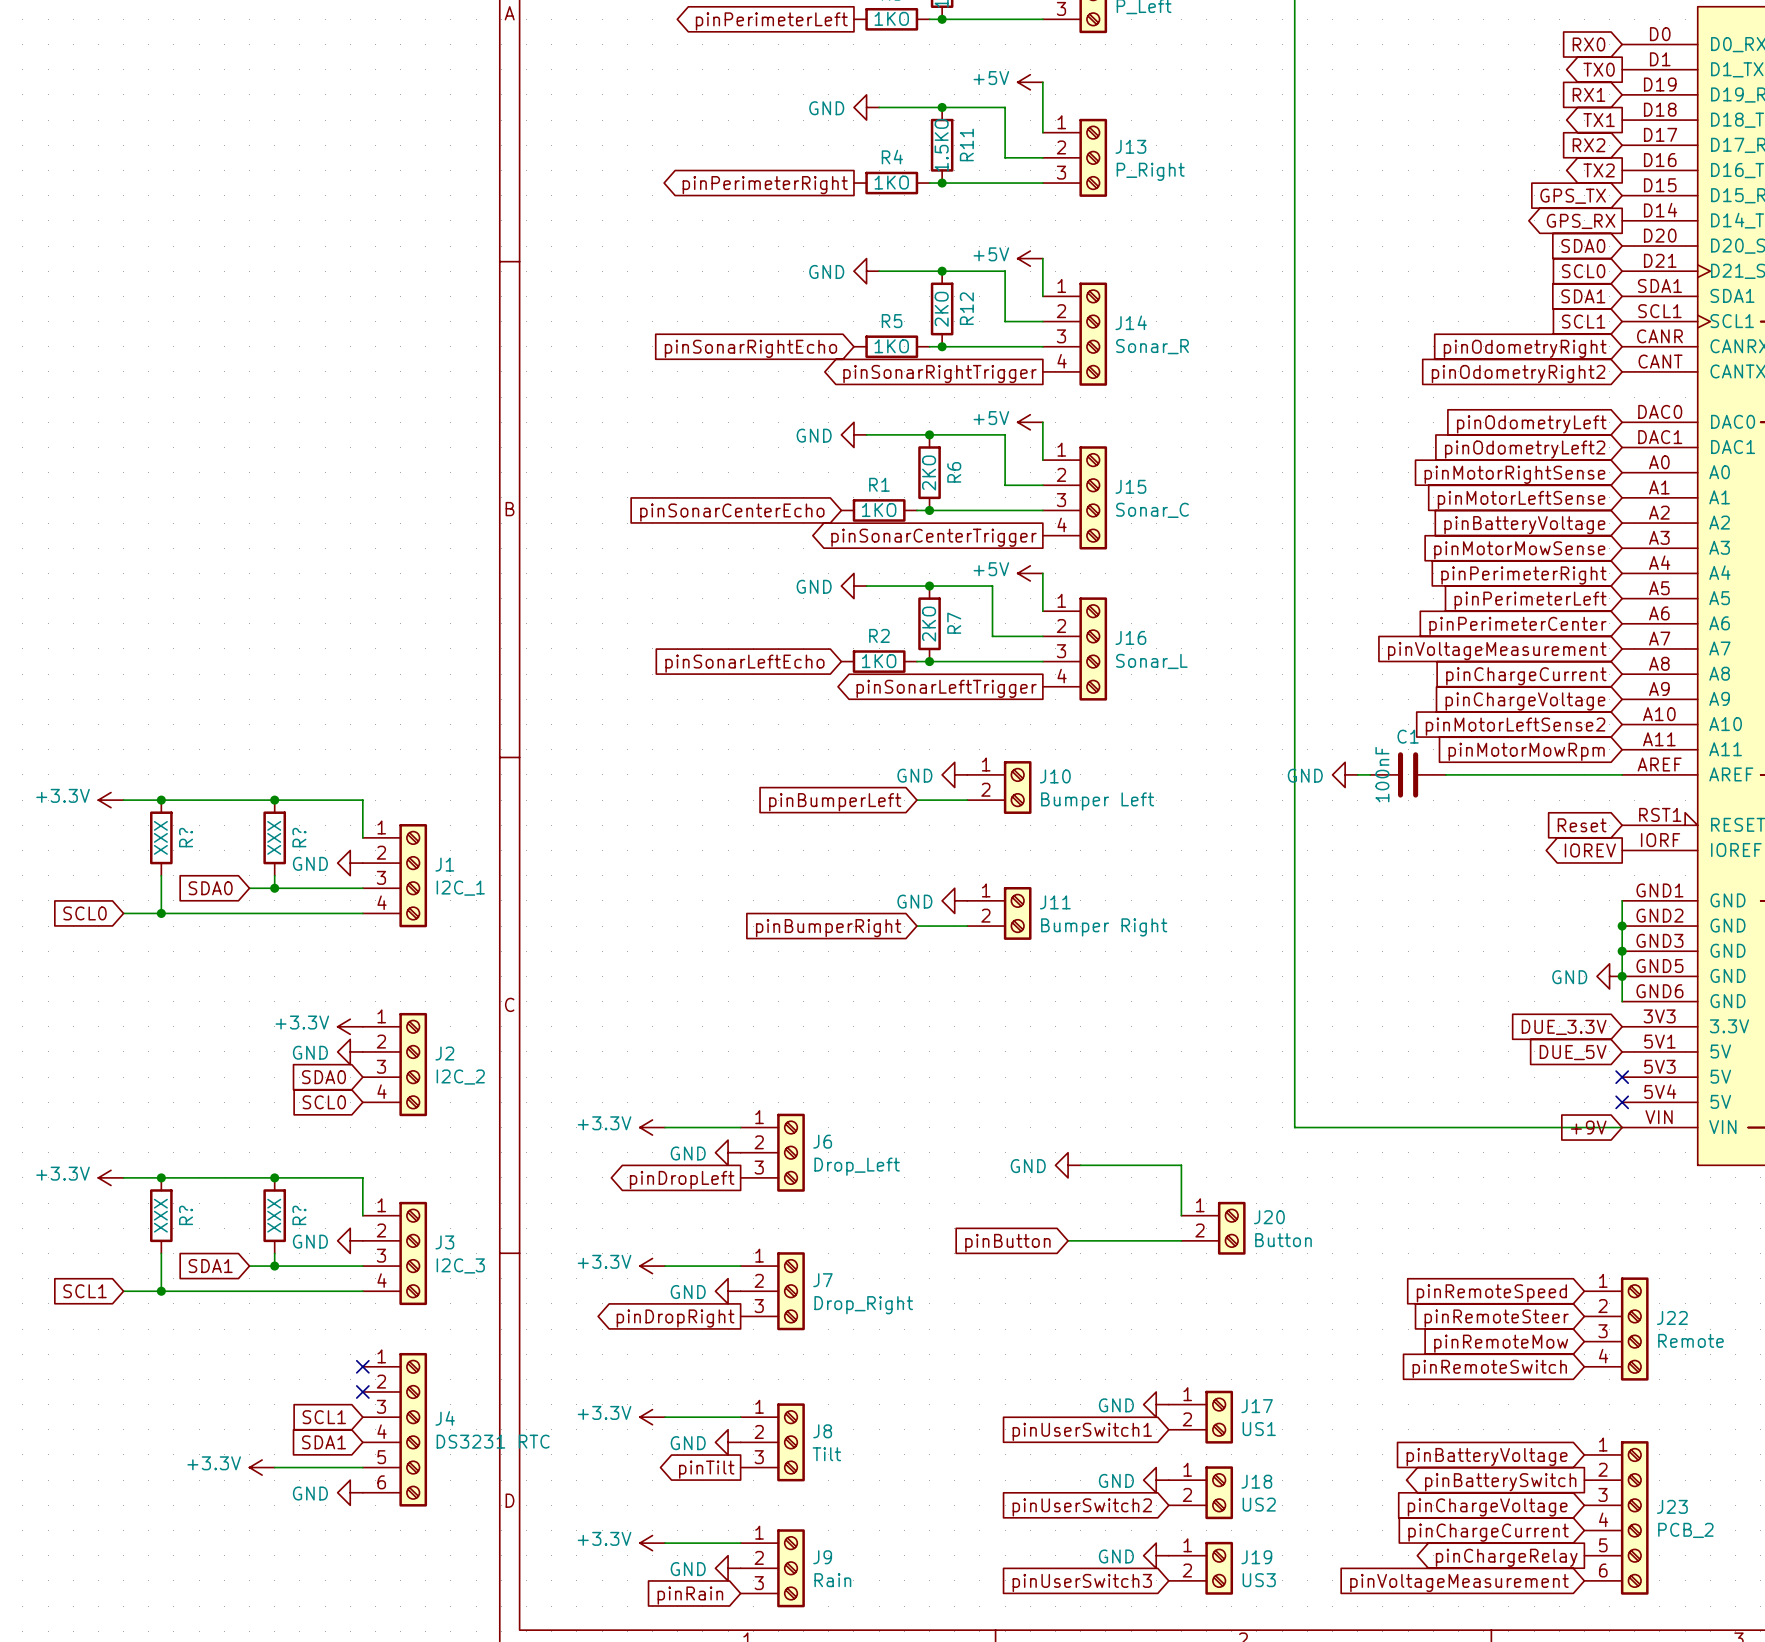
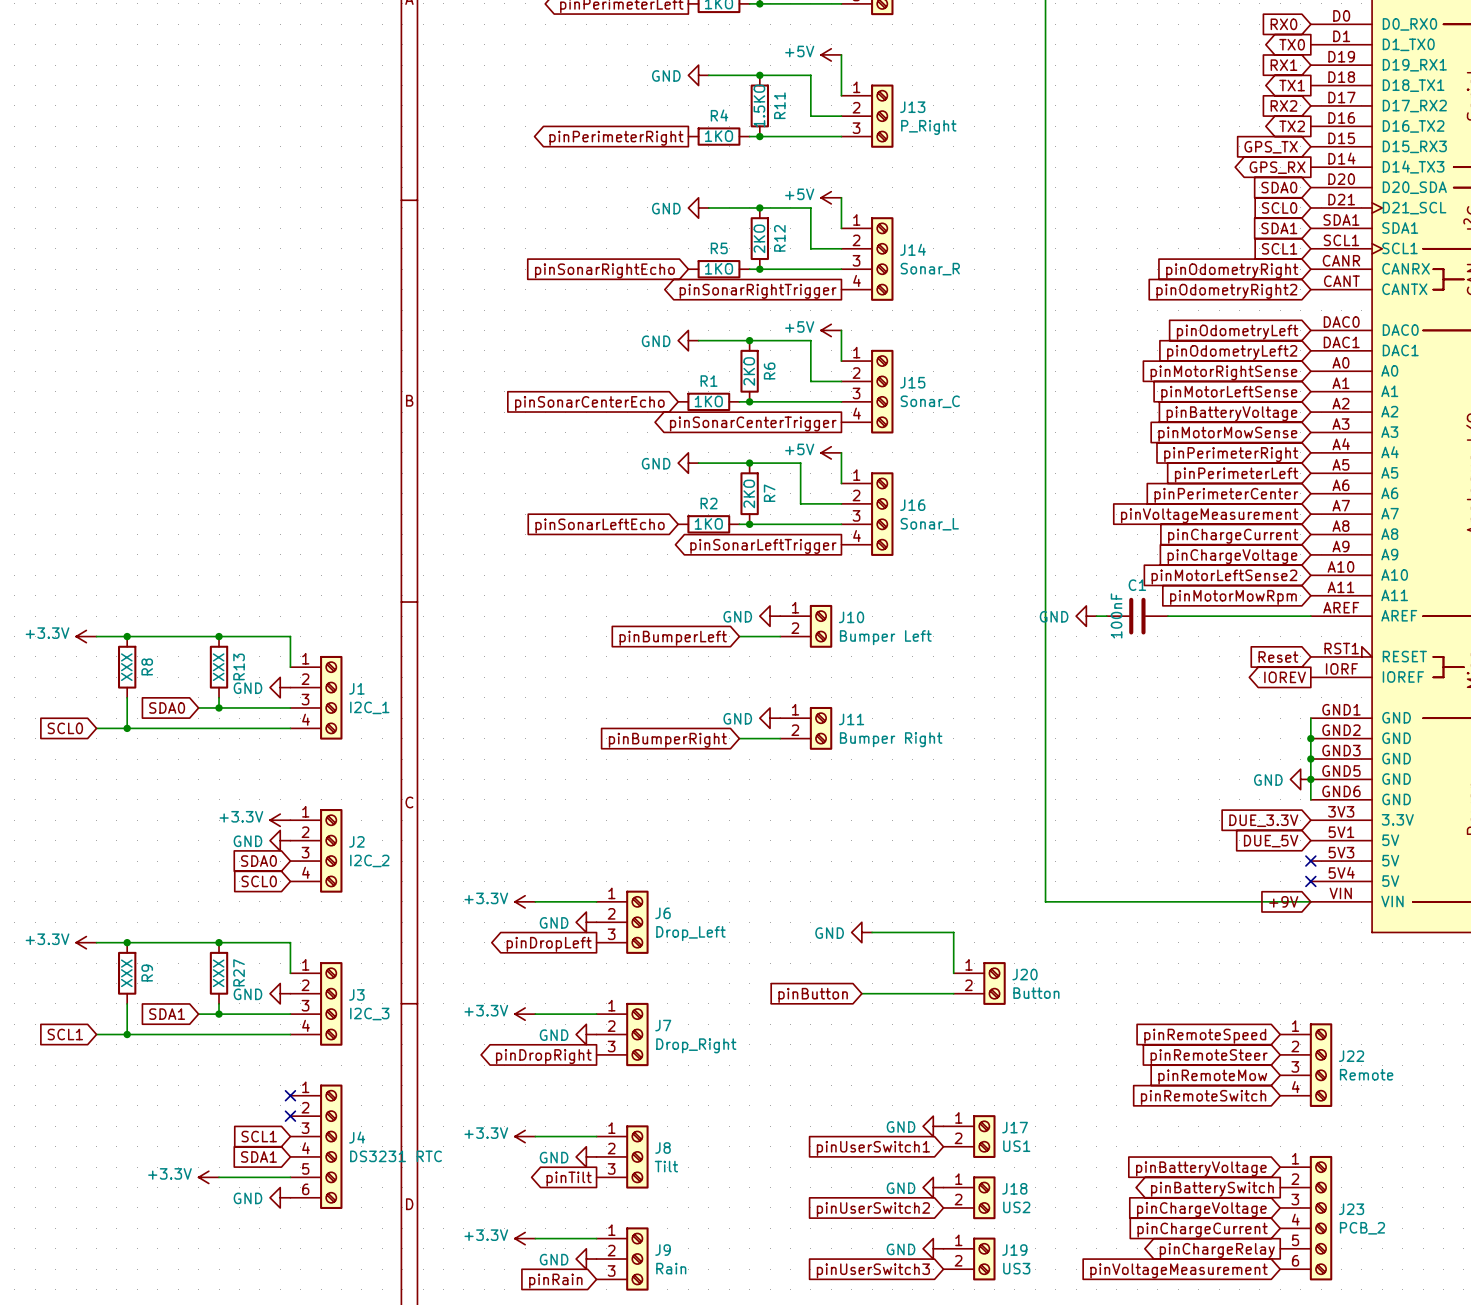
R? name: R? (186, 837) -> R8 (147, 666)
R? name: R? (299, 837) -> R13 (239, 666)
R? name: R? (186, 1215) -> R9 (147, 973)
R? name: R? (299, 1215) -> R27 (239, 972)

